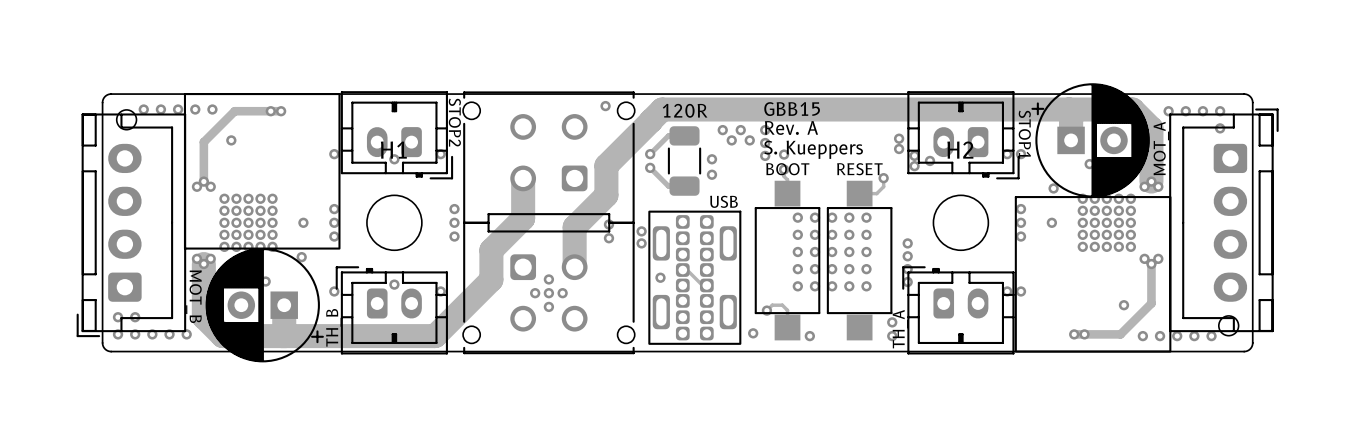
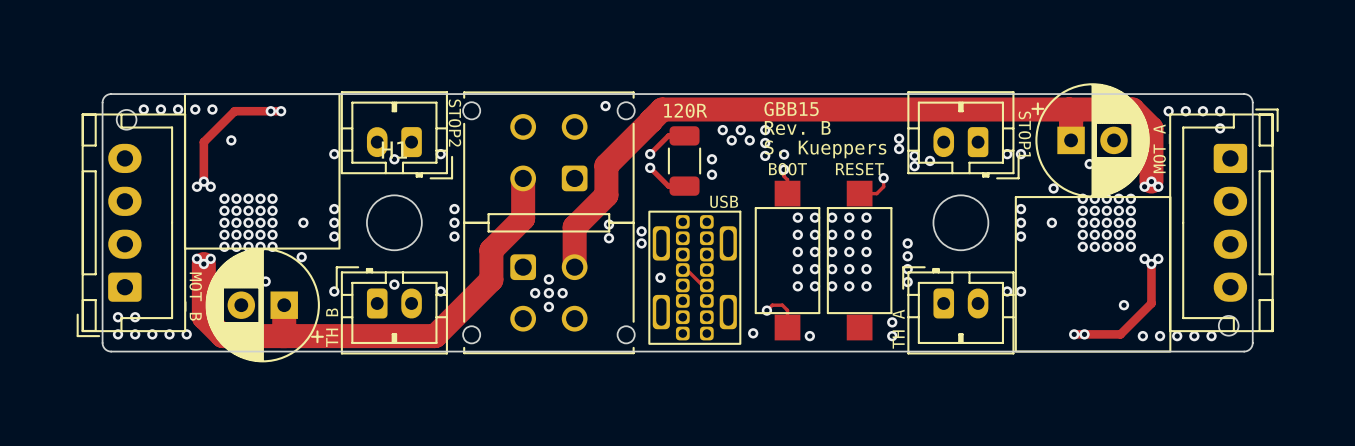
text: Rev. A (791, 127) -> Rev. B (797, 128)
H2 name: H2 (960, 150) -> none

